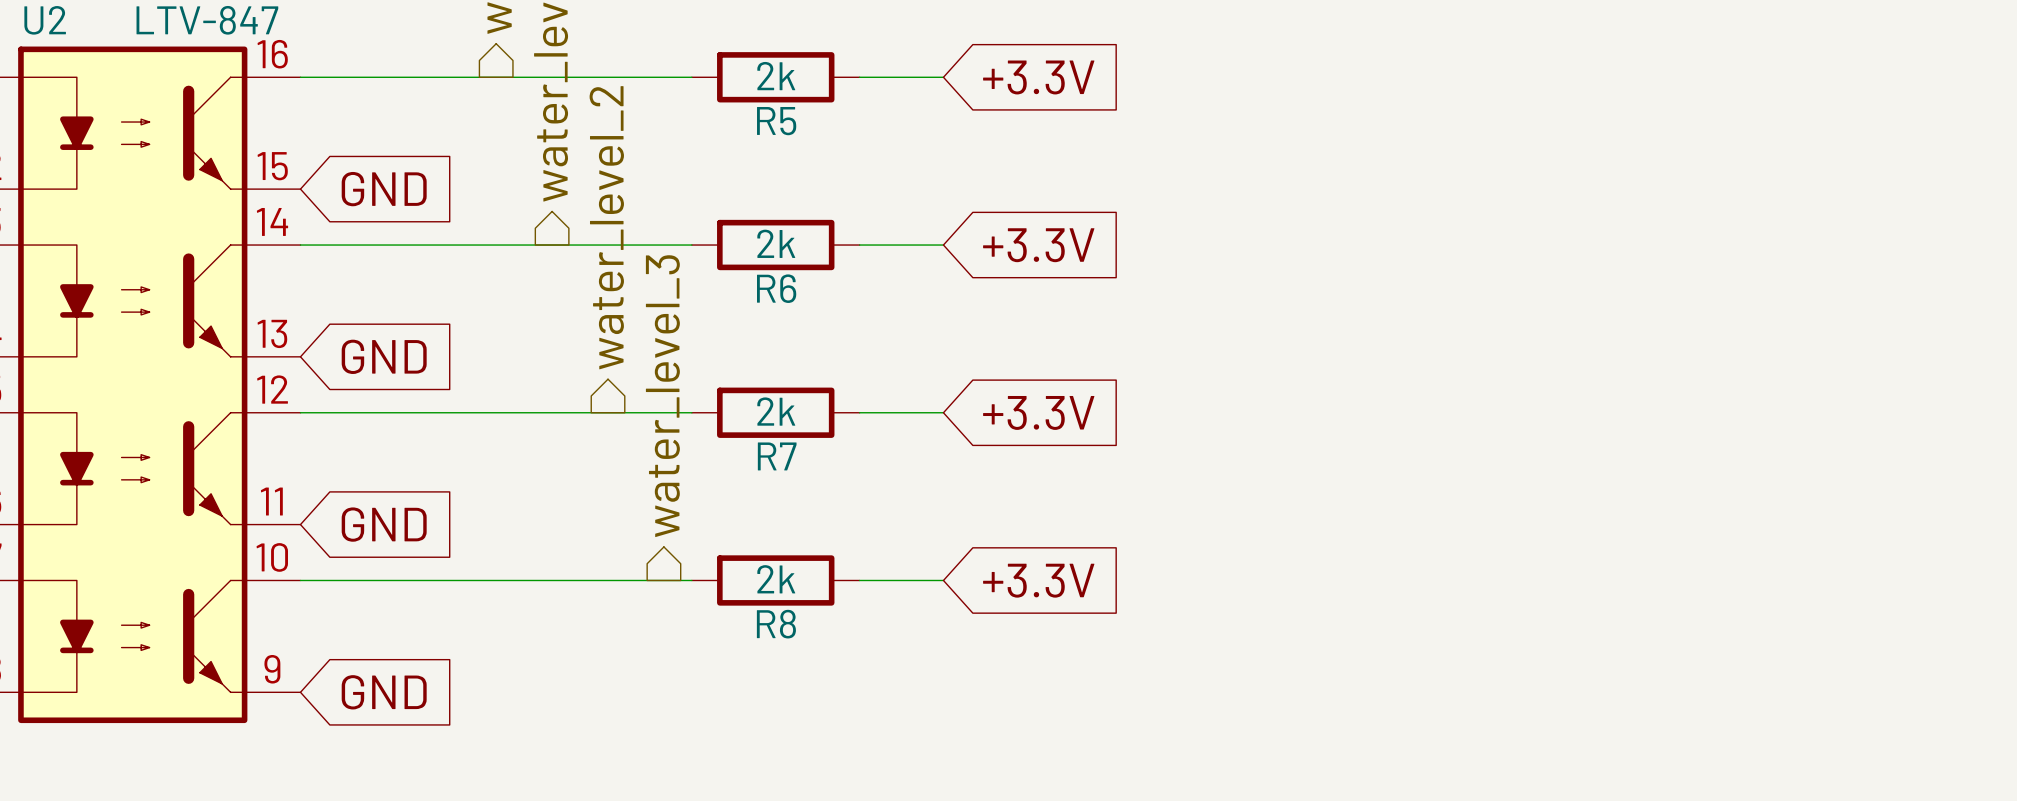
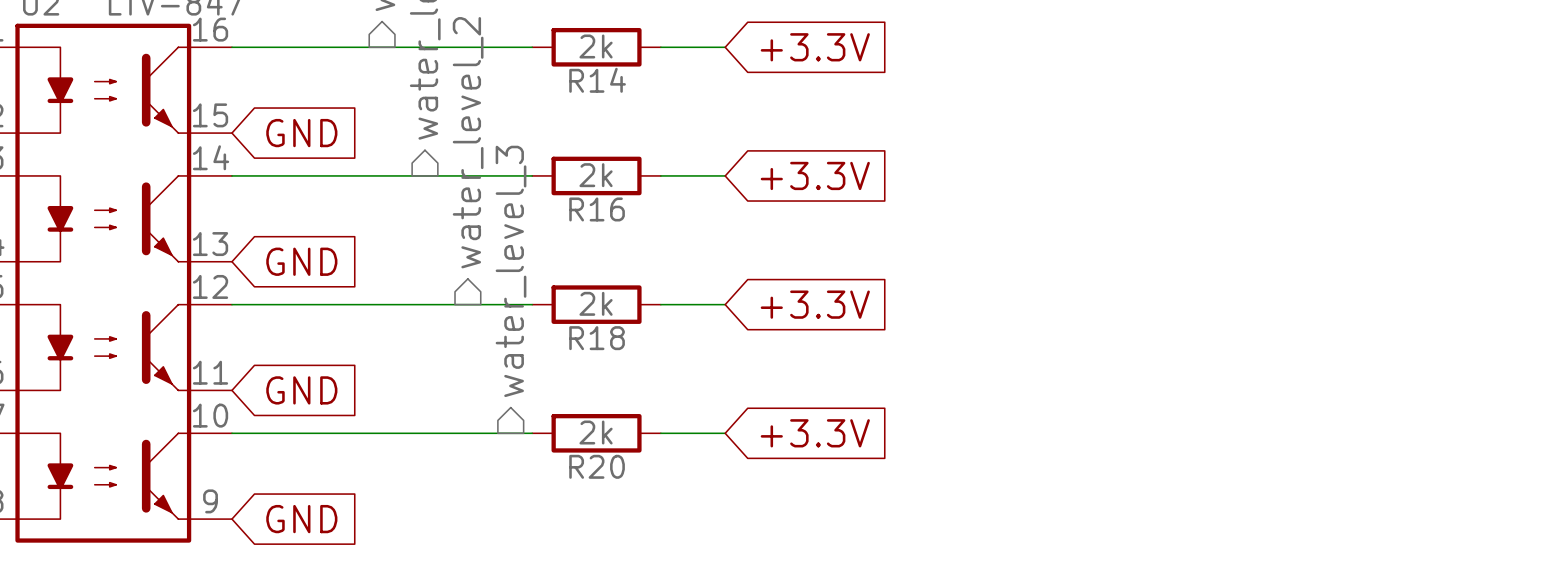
R5 name: R5 (776, 121) -> R14 (597, 80)
R6 name: R6 (776, 288) -> R16 (597, 209)
R7 name: R7 (777, 456) -> R18 (597, 338)
R8 name: R8 (776, 624) -> R20 (597, 466)

